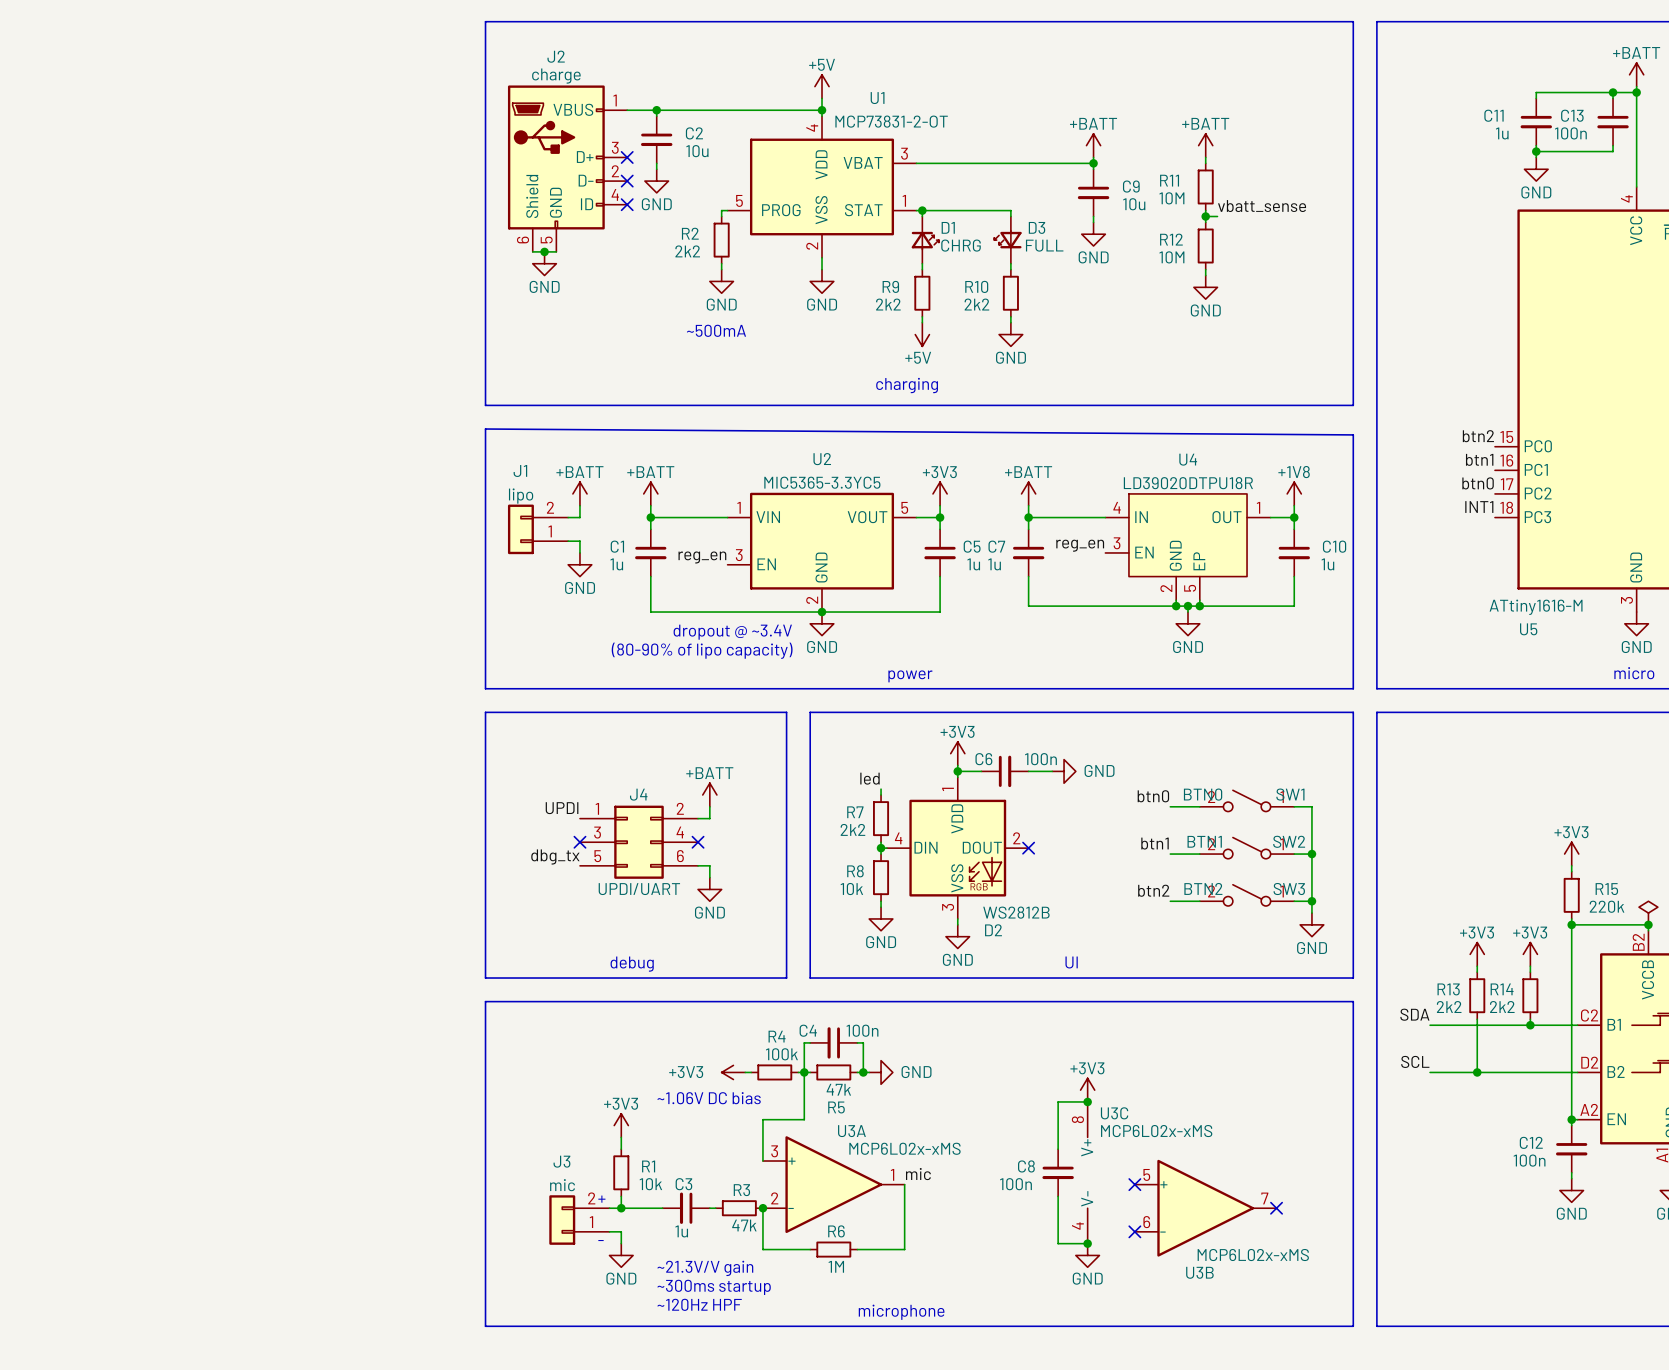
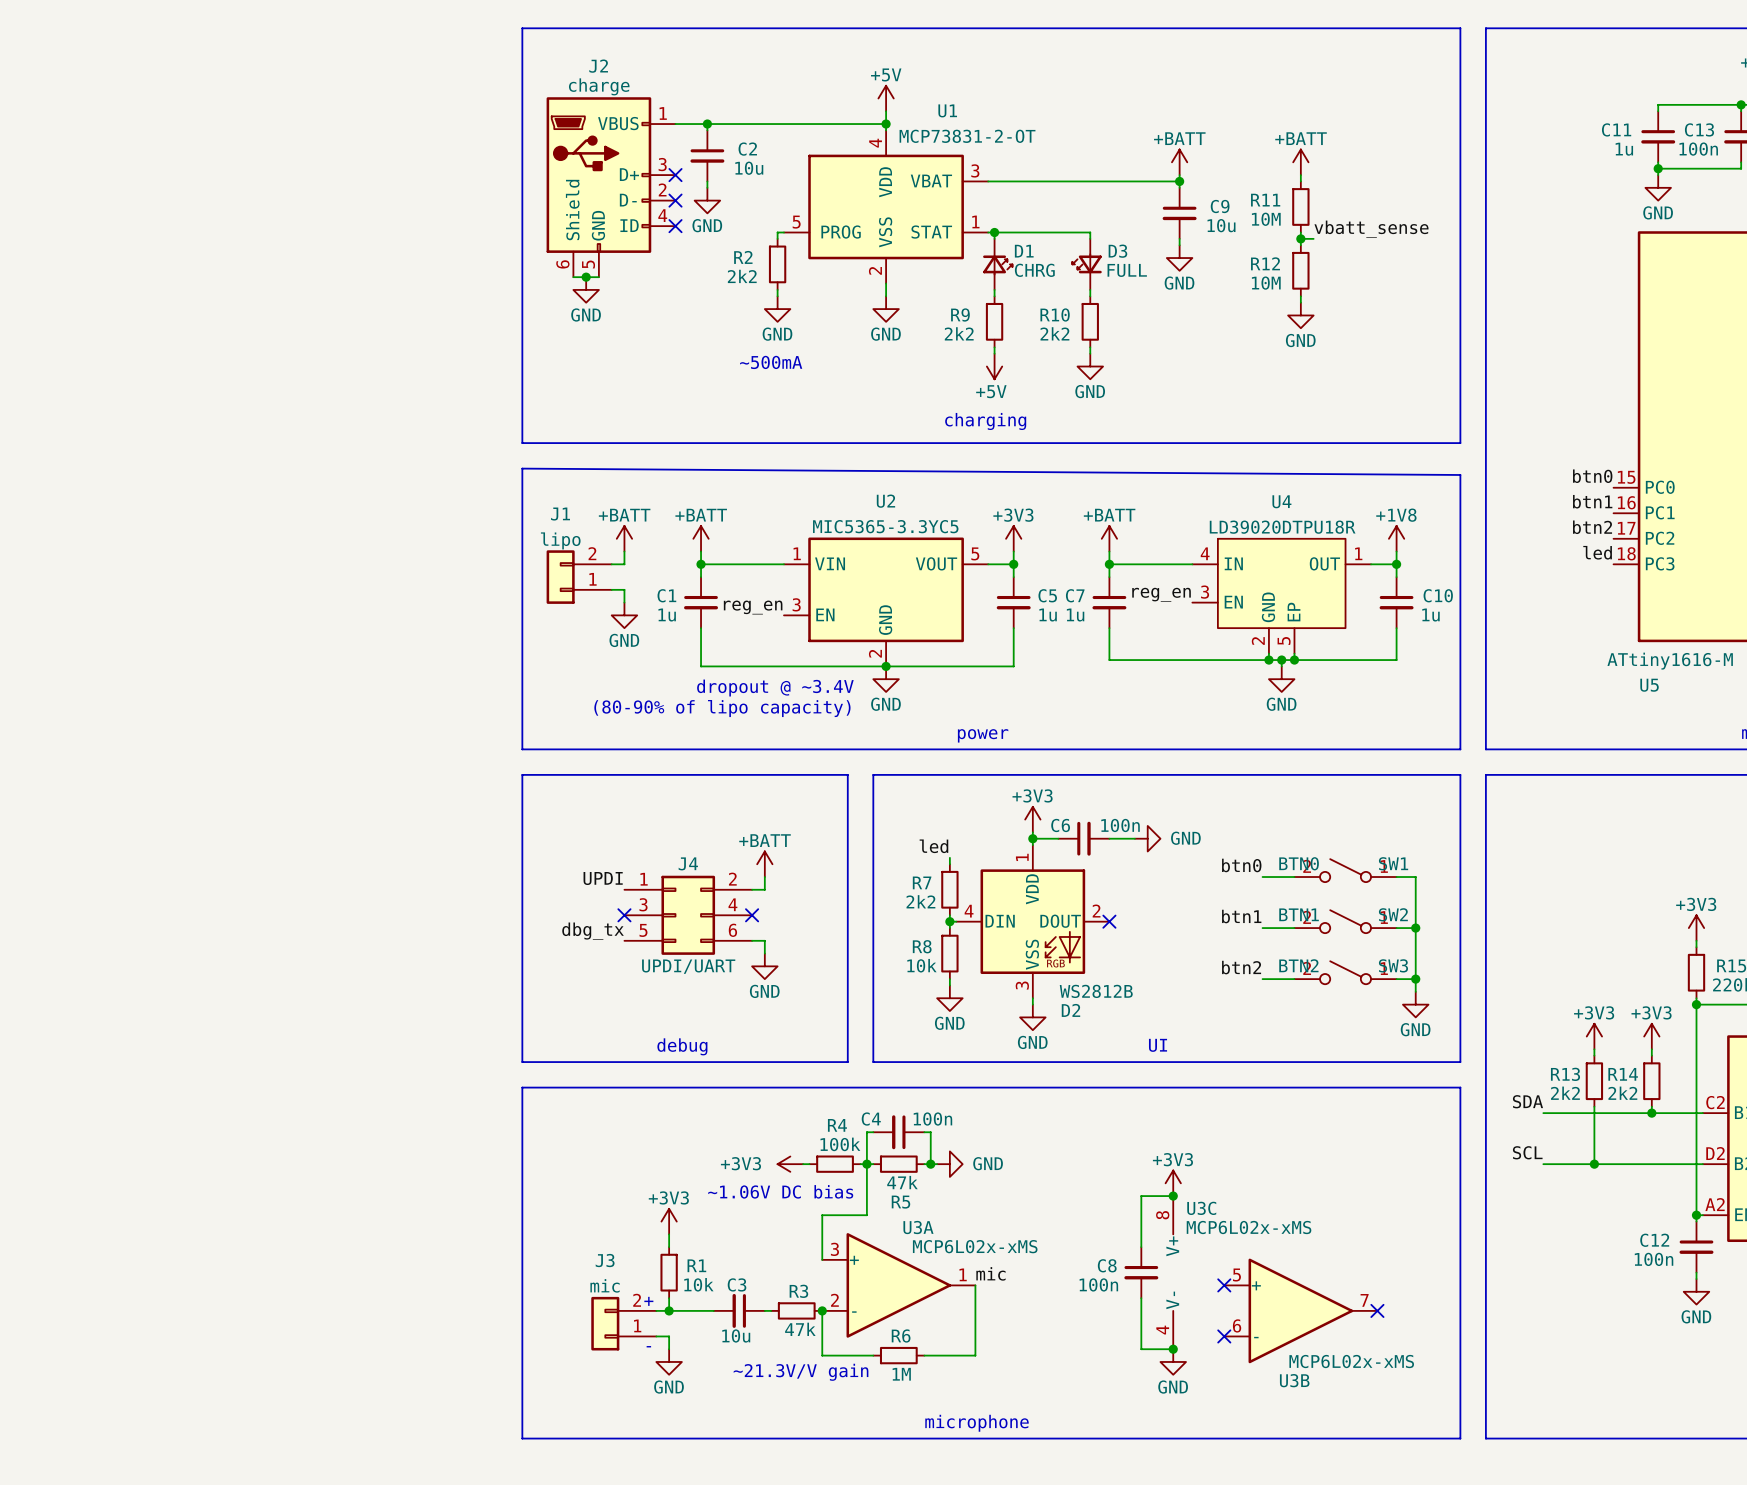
label: btn2 (1478, 436) -> btn0 (1592, 476)
label: btn0 (1478, 483) -> btn2 (1592, 527)
label: INT1 (1479, 507) -> led (1597, 552)
C3 value: 1u (681, 1231) -> 10u (736, 1335)
text position: ~21.3V/V gain (705, 1268) -> ~21.3V/V gain (801, 1372)
text: ~300ms startup (714, 1287) -> none
text: ~120Hz HPF (699, 1304) -> none

